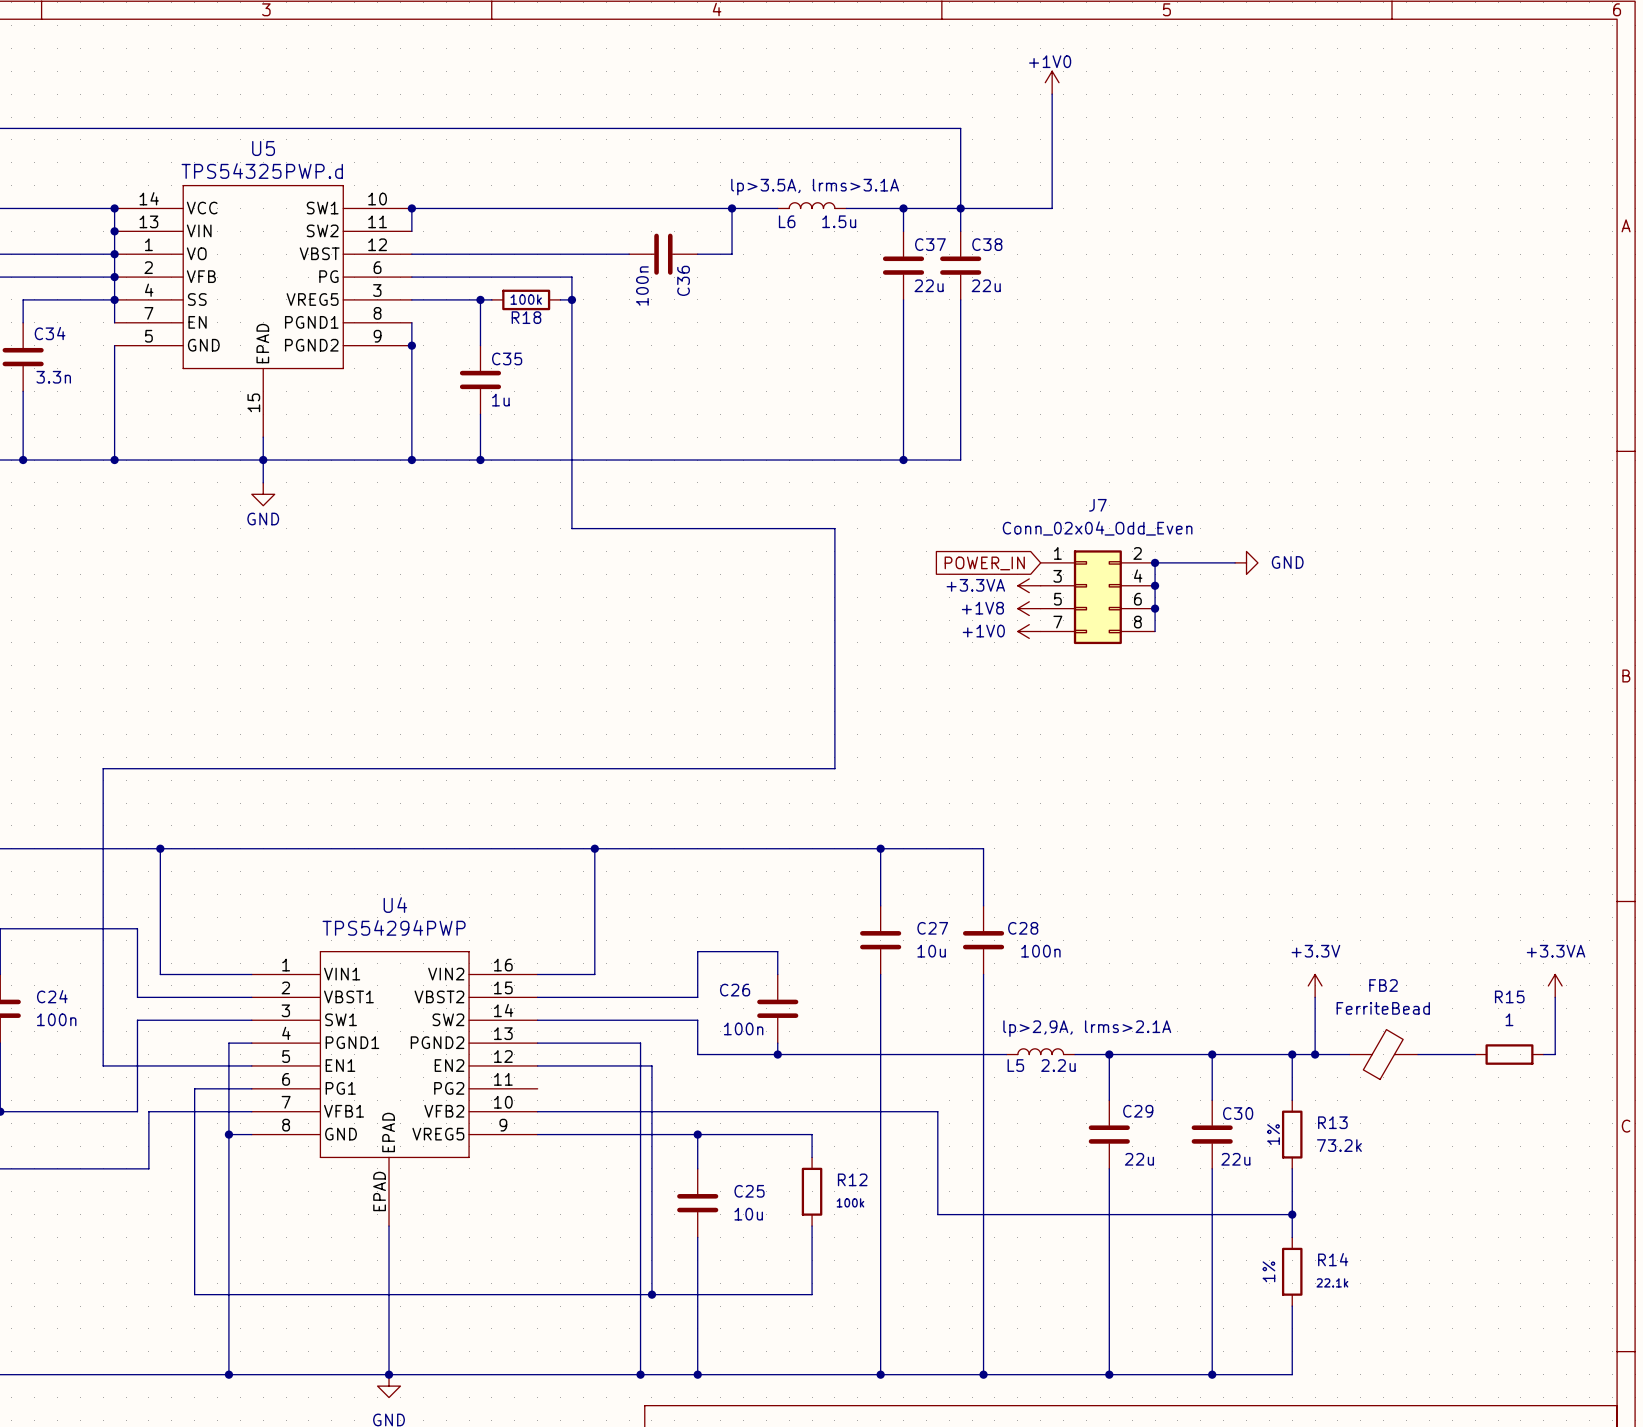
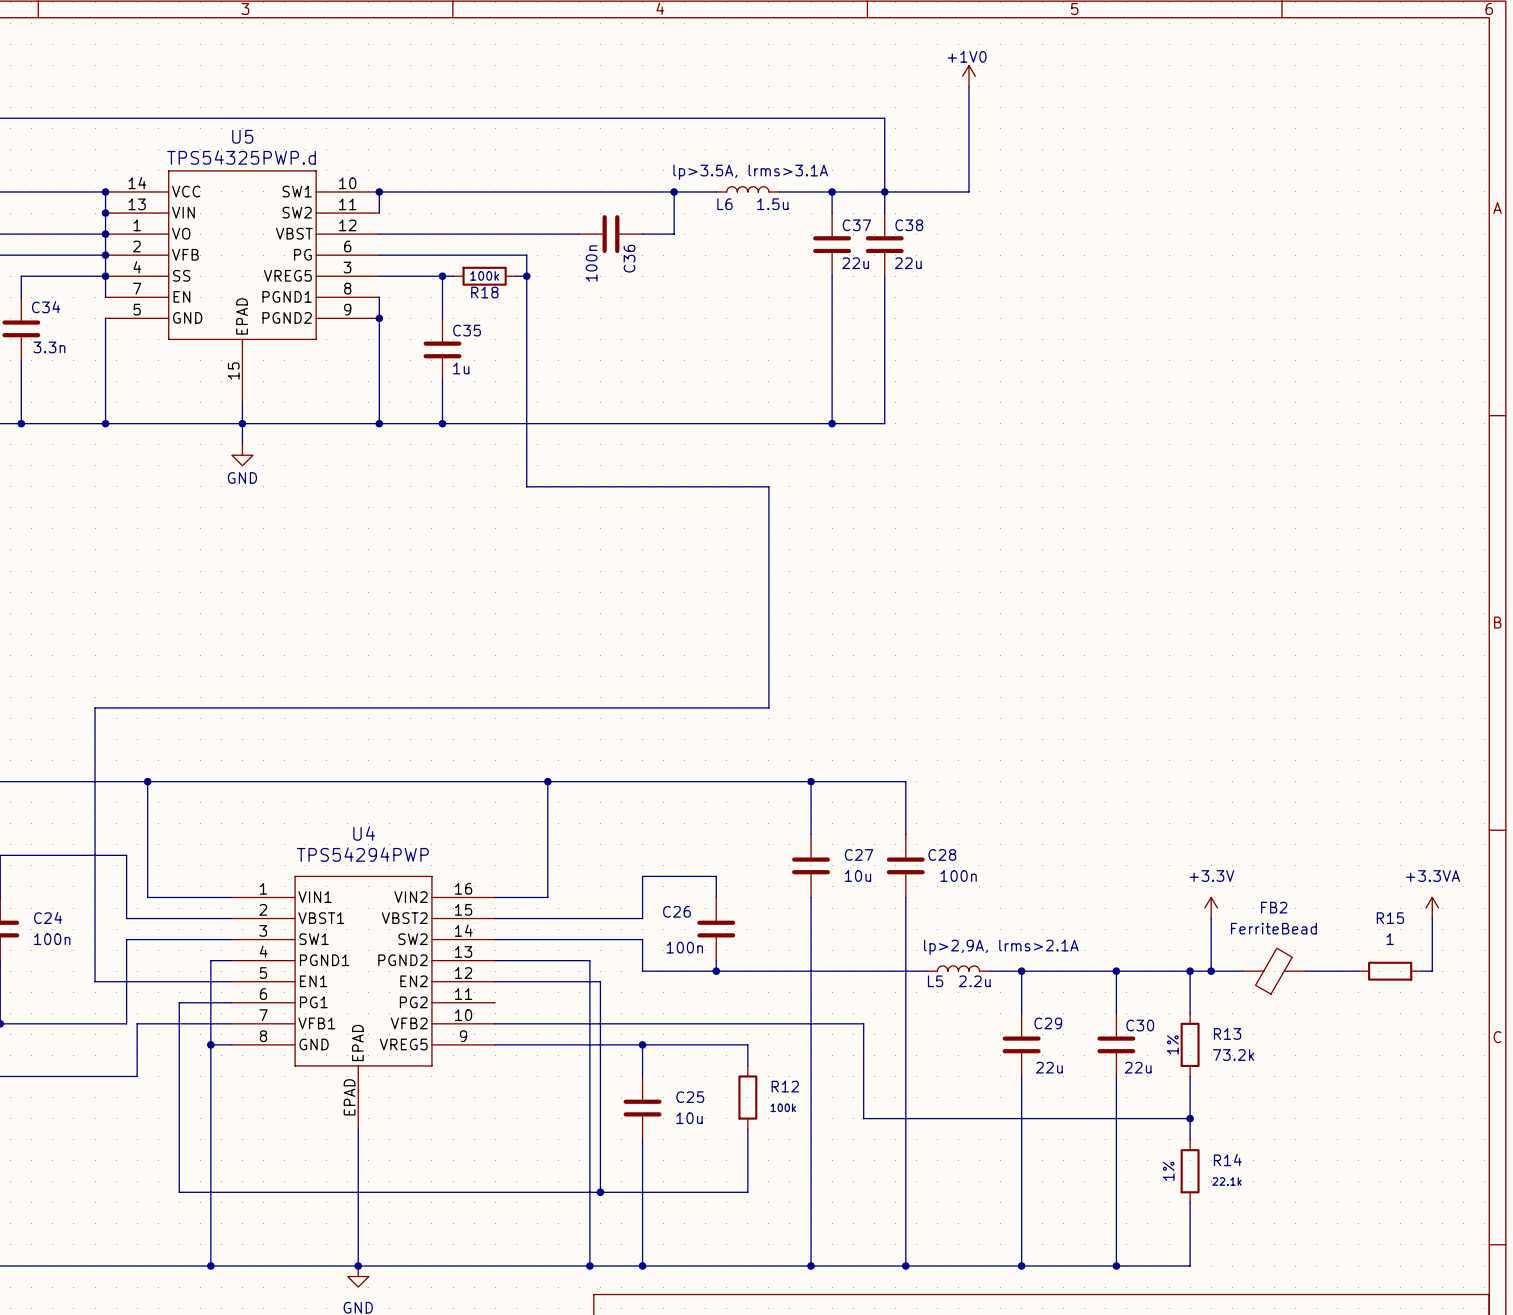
junction: (1155, 562) -> none
wire: (1235, 562) (1155, 562) (1155, 631) -> none
power symbol: GND (1246, 562) -> none
global label: POWER_IN (984, 563) -> none
power symbol: +3.3VA (1029, 585) -> none
junction: (1155, 585) -> none
J7: Conn_02x04_Odd_Even (1097, 597) -> none
power symbol: +1V8 (1029, 608) -> none
junction: (1155, 608) -> none
power symbol: +1V0 (1029, 631) -> none

